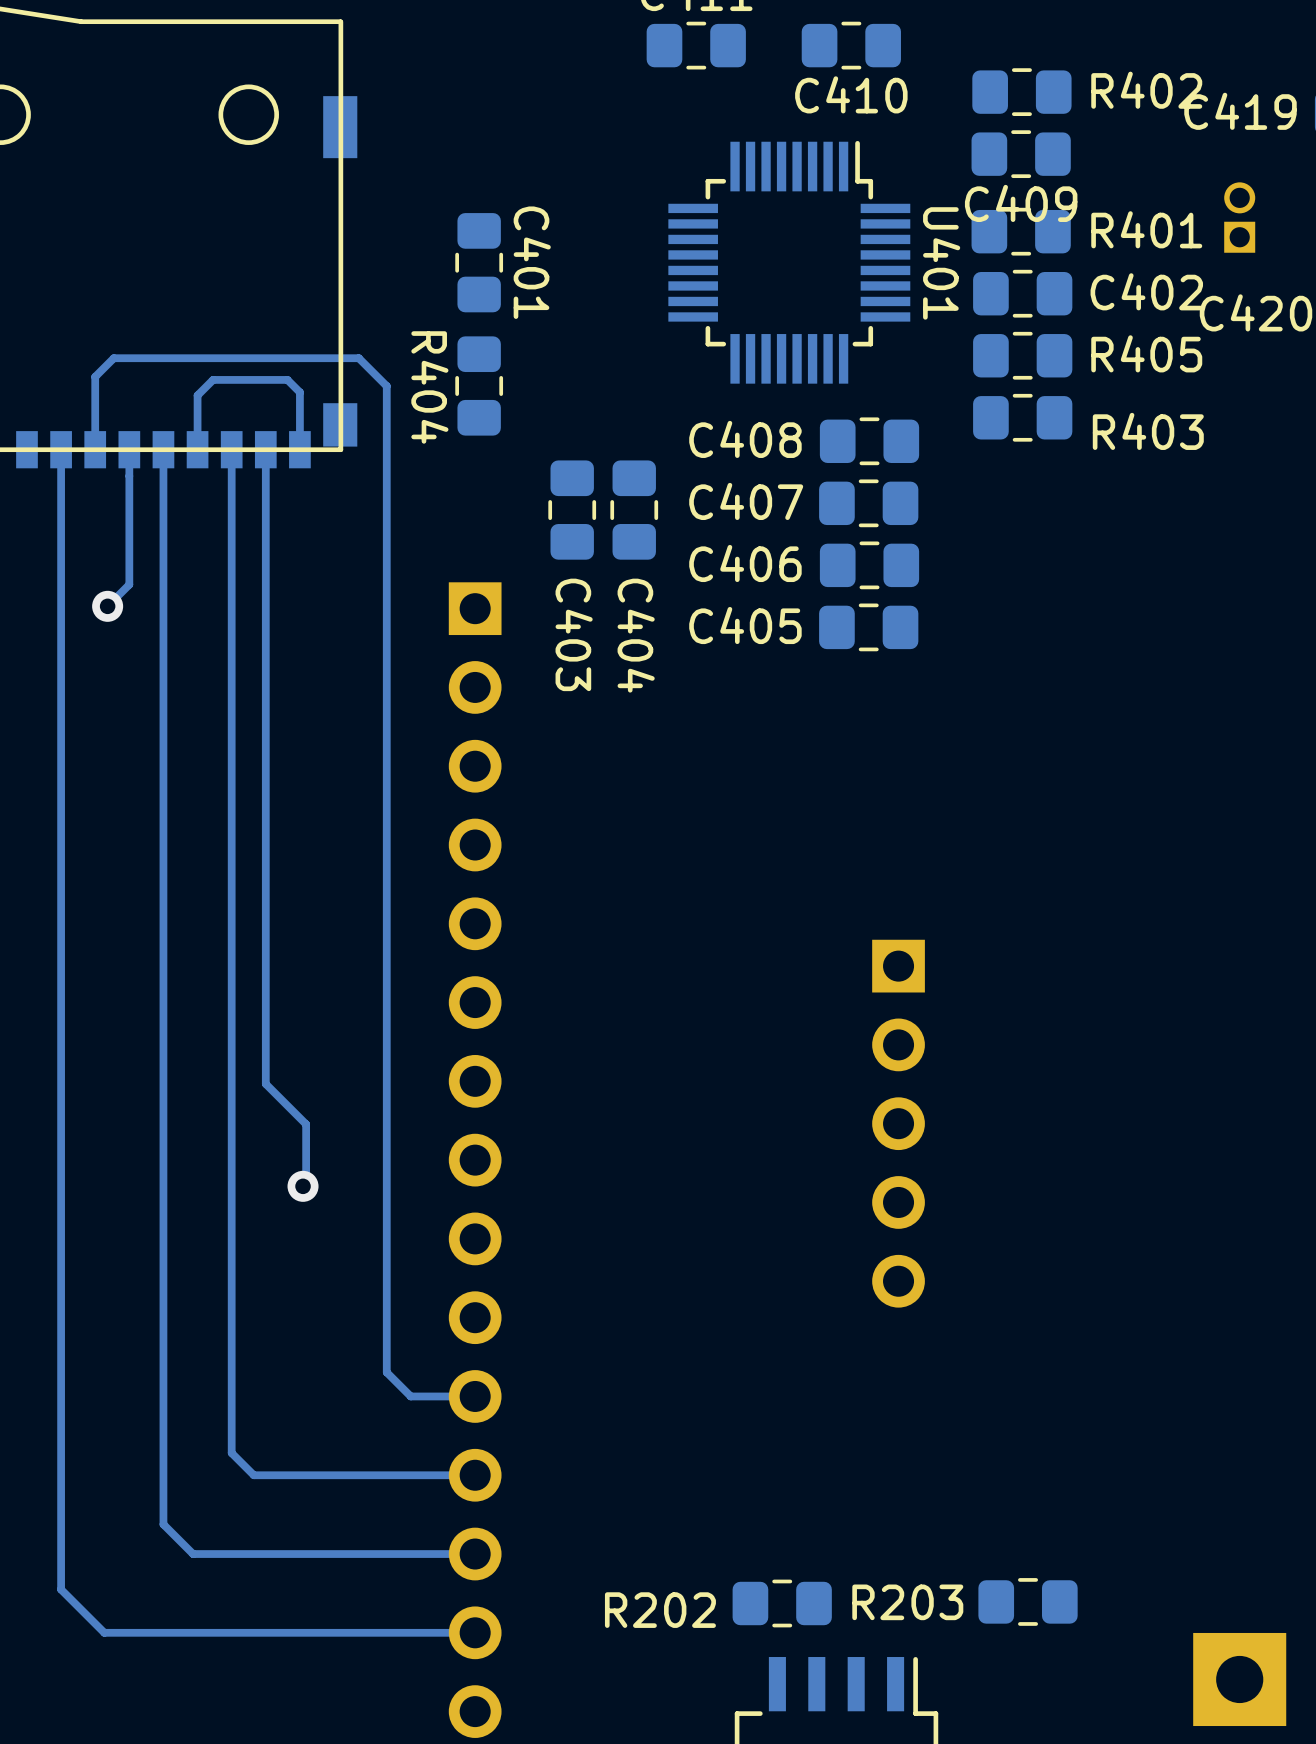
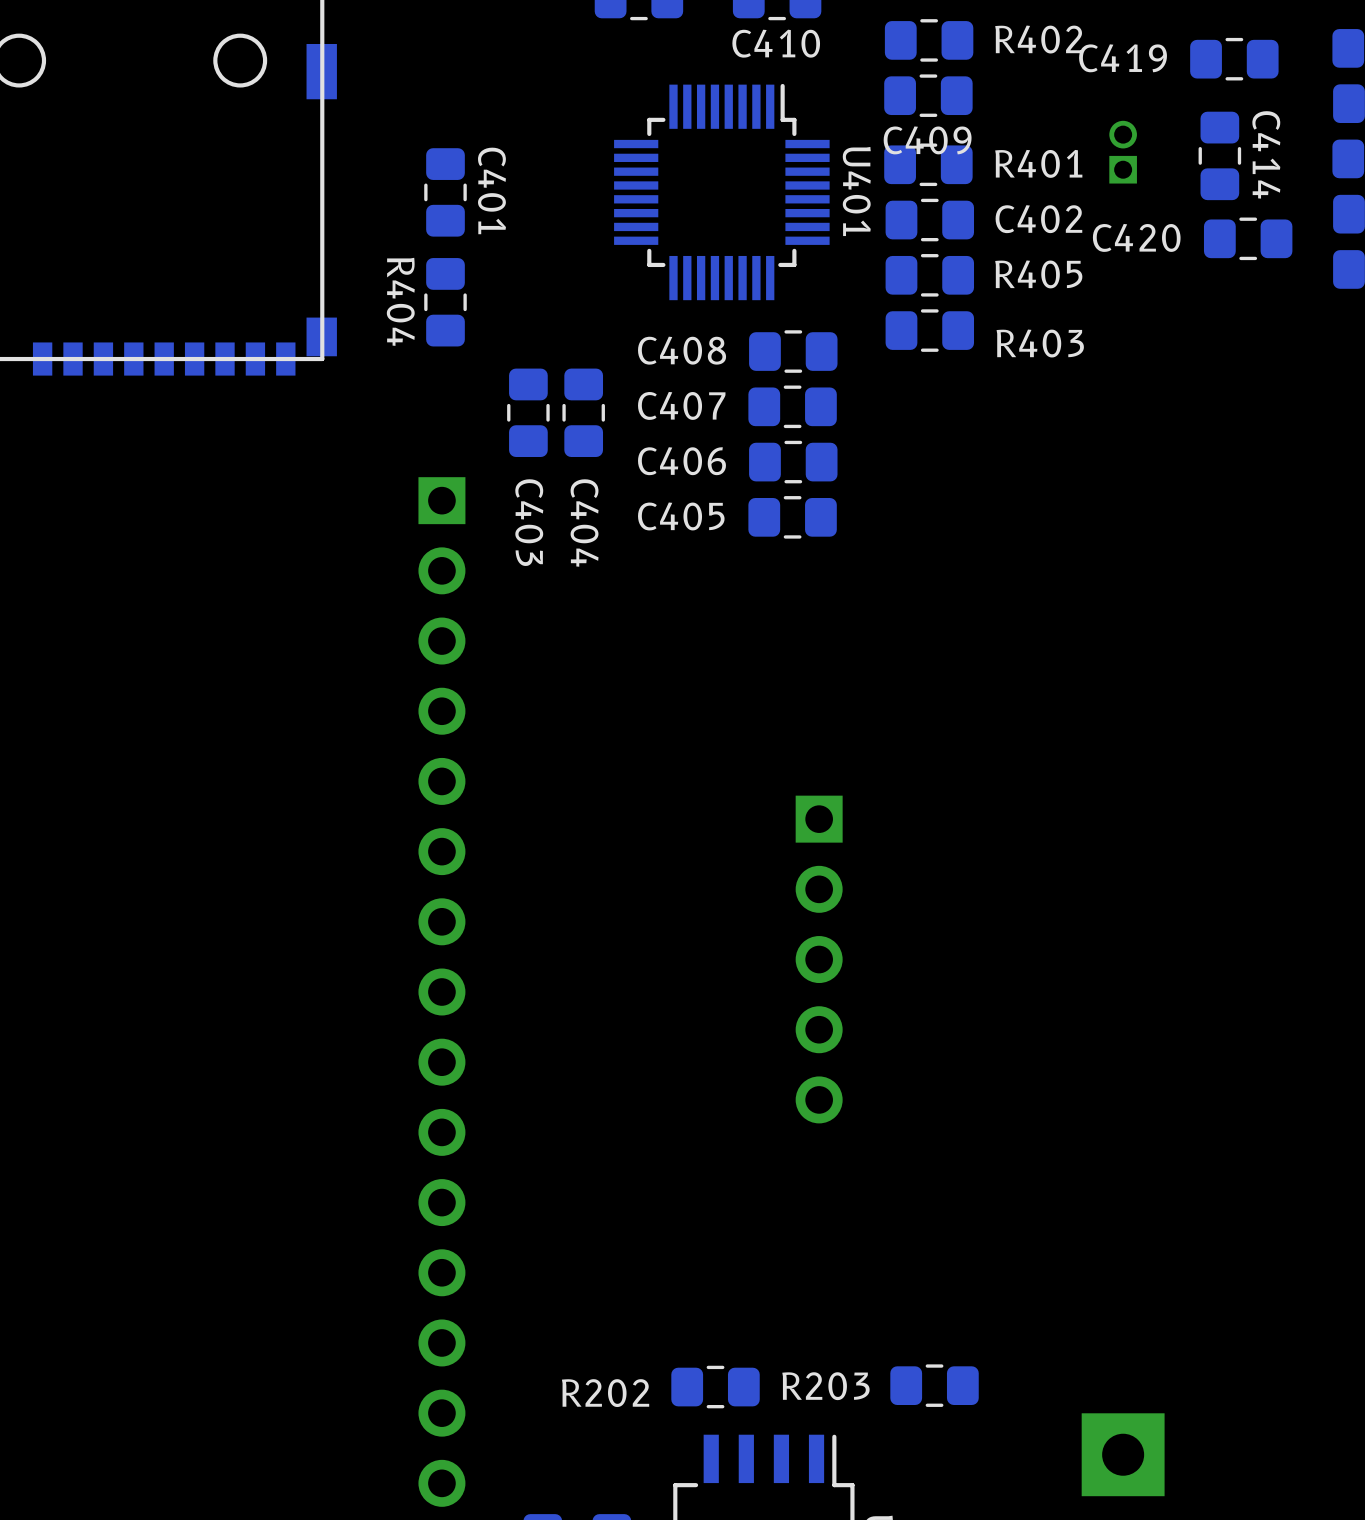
track: (61, 449) (61, 1589) (104, 1632) (475, 1632) -> none
track: (95, 449) (95, 376) (113, 358) (358, 358) (386, 386) (386, 1372) (410, 1396) (475, 1396) -> none
track: (129, 449) (129, 584) (107, 606) -> none
track: (163, 449) (163, 1524) (193, 1554) (475, 1554) -> none
track: (231, 449) (231, 1453) (253, 1475) (475, 1475) -> none
track: (265, 449) (265, 1083) (306, 1124) (306, 1183) (303, 1186) -> none
track: (299, 449) (299, 392) (287, 379) (213, 379) (197, 395) (197, 449) -> none
via: (107, 606) -> none
via: (303, 1186) -> none

